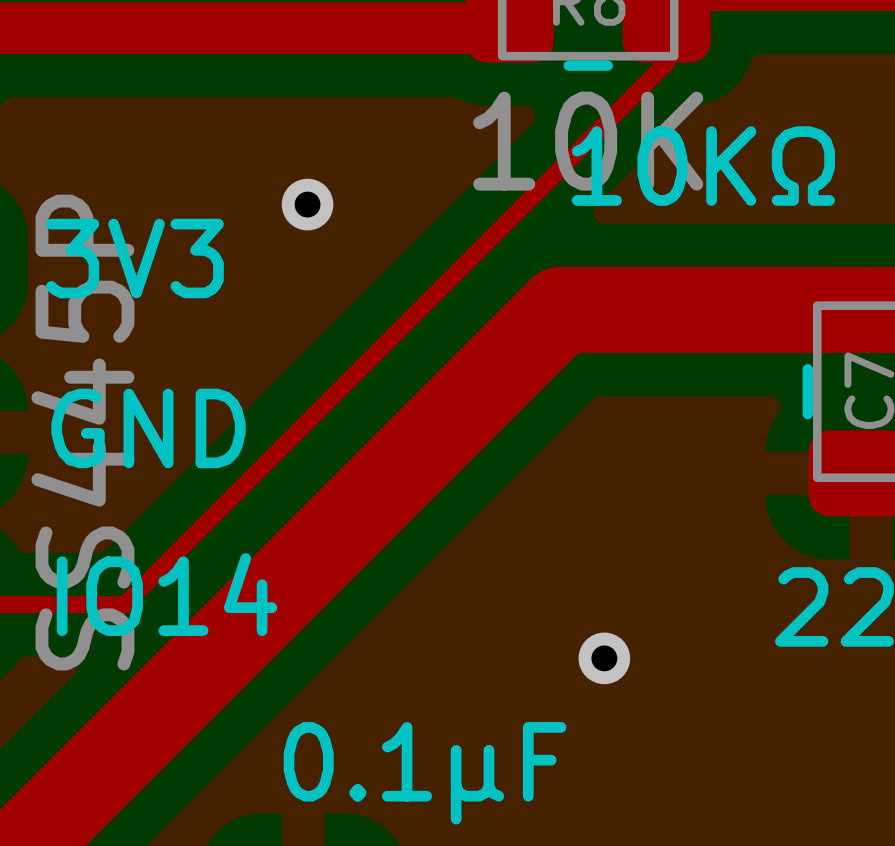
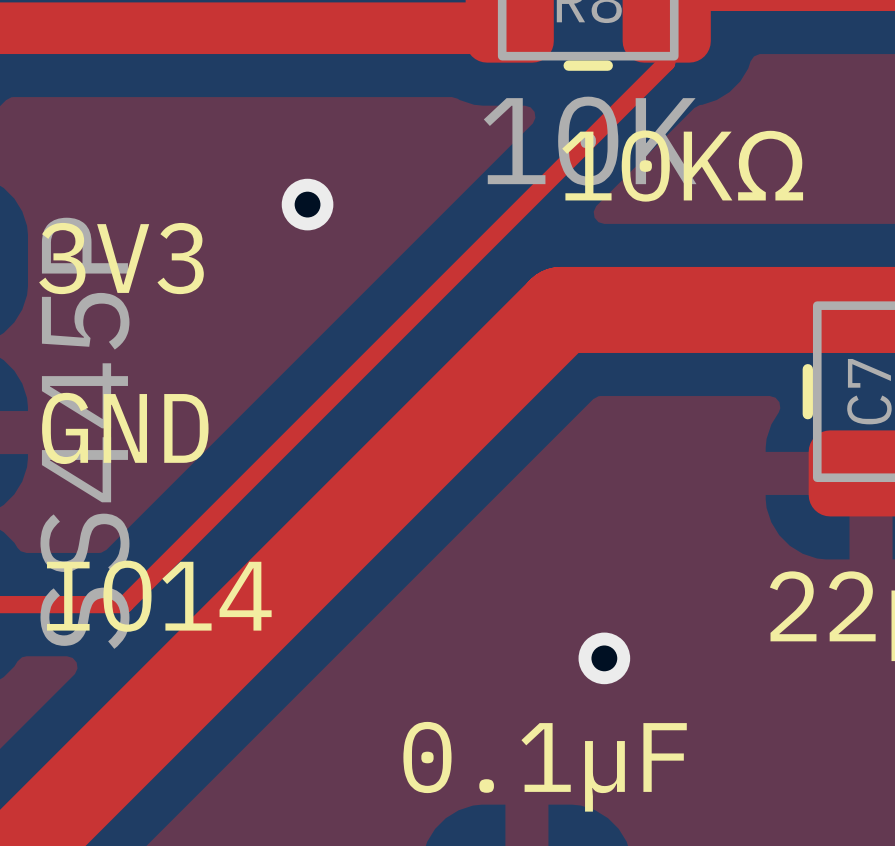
text position: 0.1µF (425, 773) -> 0.1µF (545, 766)

